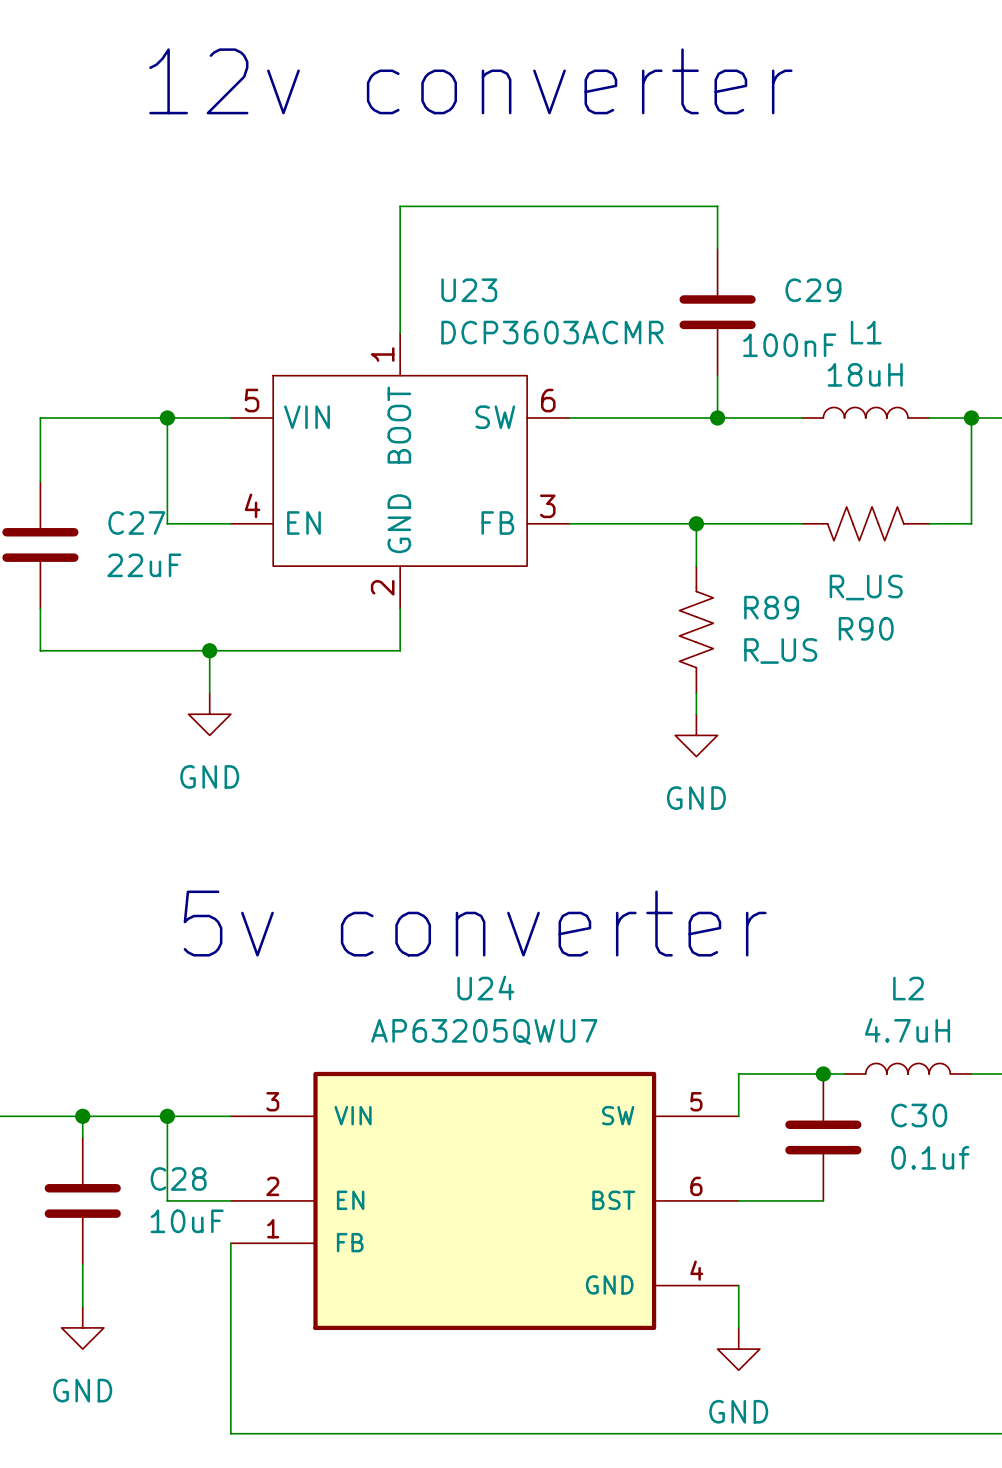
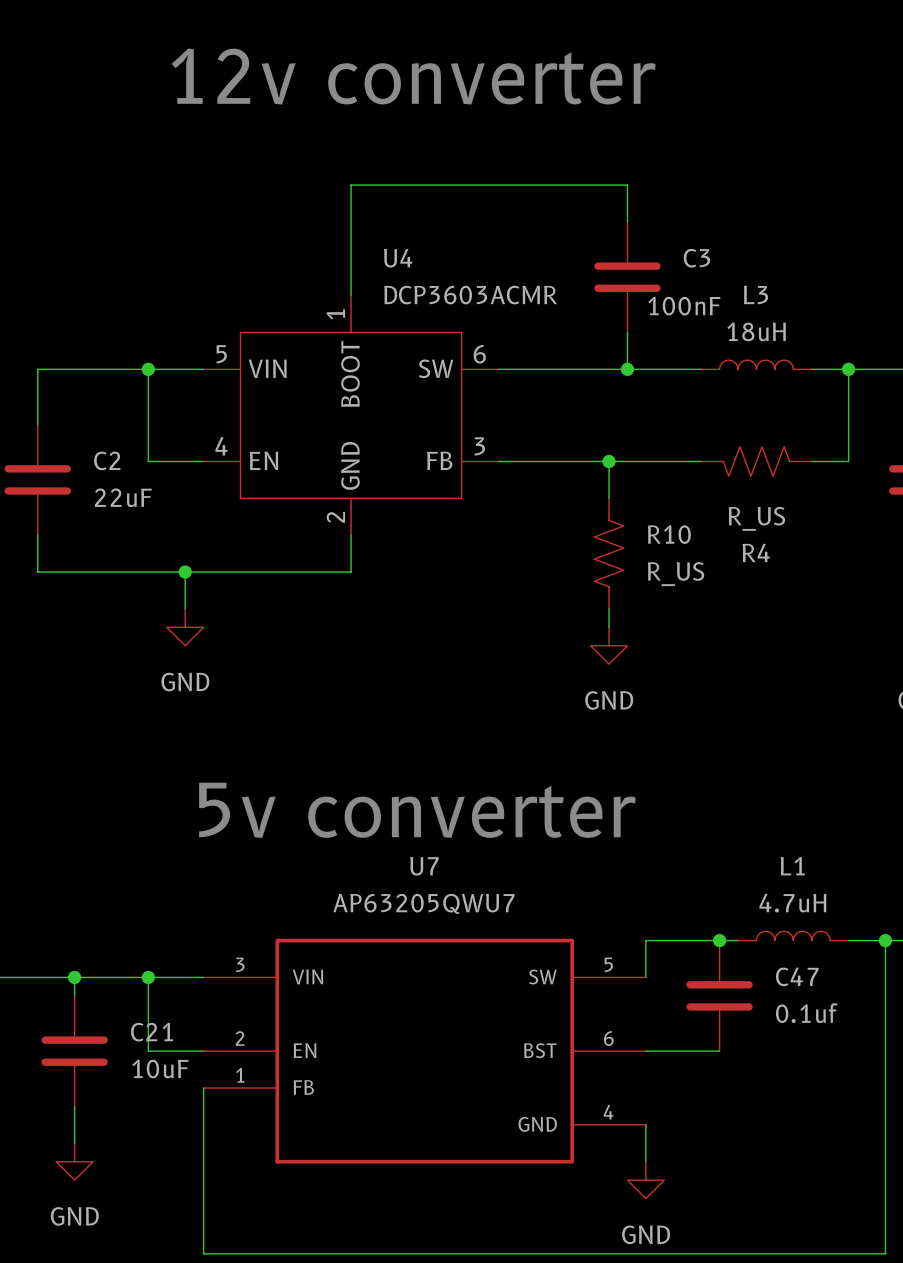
U23 name: U23 (469, 290) -> U4 (398, 258)
C29 name: C29 (813, 290) -> C3 (696, 258)
L1 name: L1 (866, 332) -> L3 (755, 294)
C27 name: C27 (136, 523) -> C2 (107, 460)
R89 name: R89 (771, 607) -> R10 (669, 534)
R90 name: R90 (866, 628) -> R4 (756, 552)
U24 name: U24 (485, 988) -> U7 (424, 866)
L2 name: L2 (908, 988) -> L1 (792, 866)
C30 name: C30 (919, 1115) -> C47 (797, 976)
C28 name: C28 (178, 1179) -> C21 (151, 1032)

